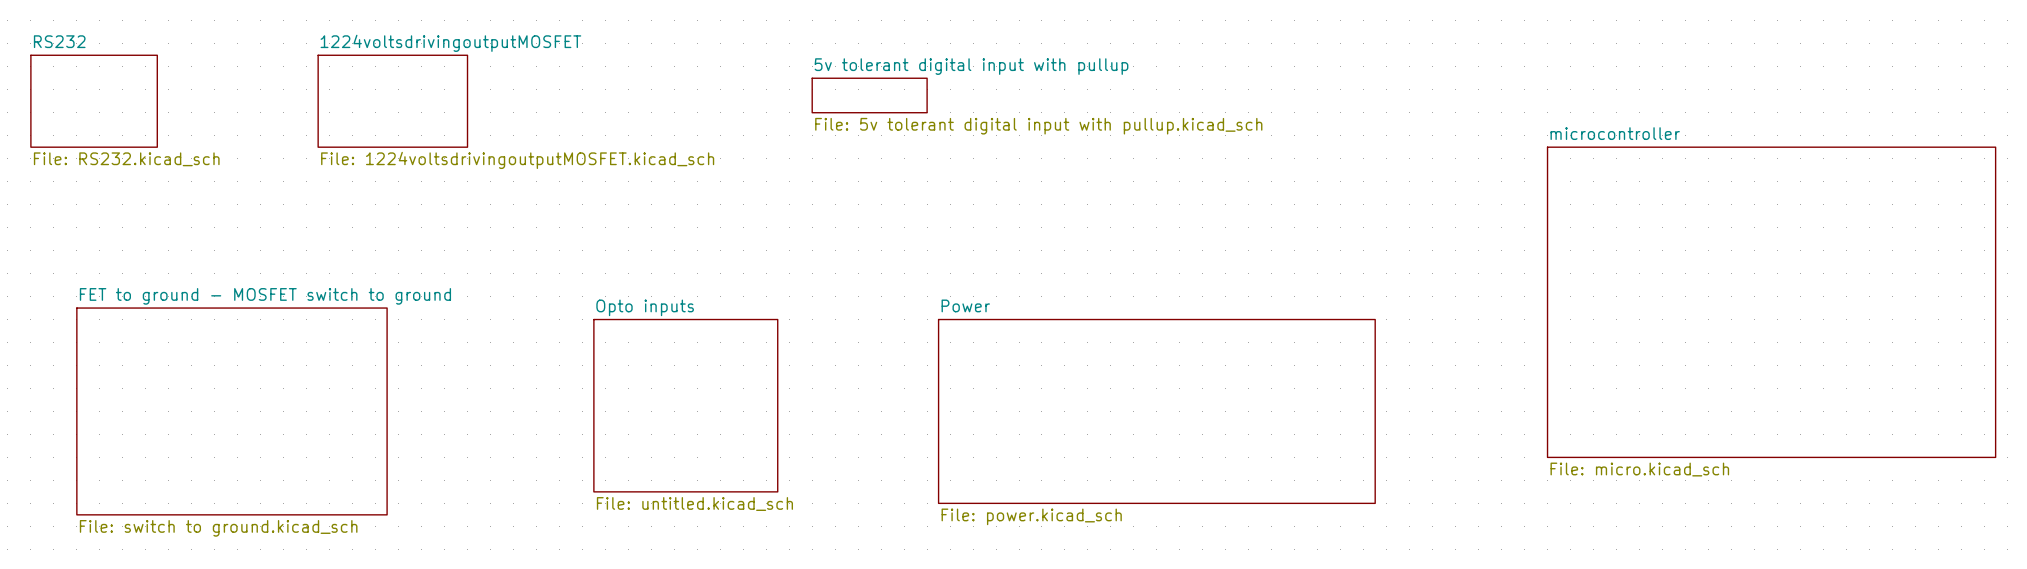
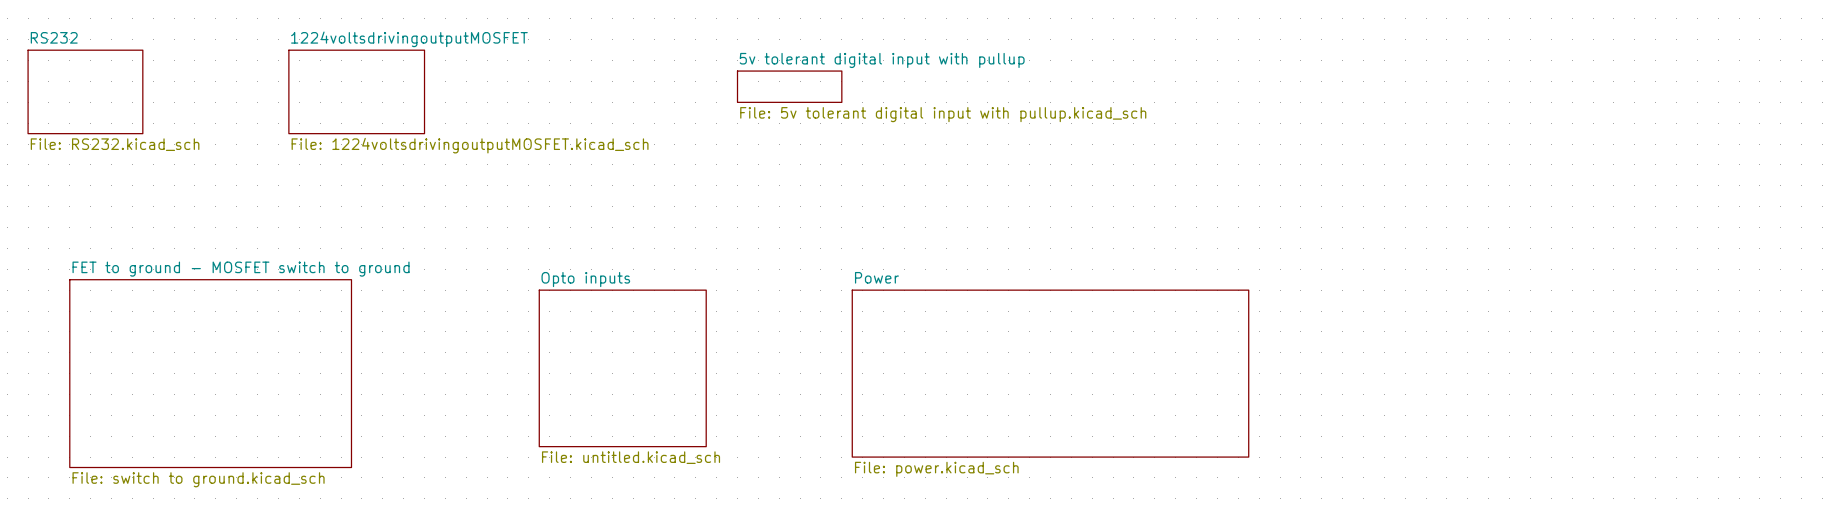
sheet microcontroller: File: micro.kicad_sch (1771, 302) -> none

